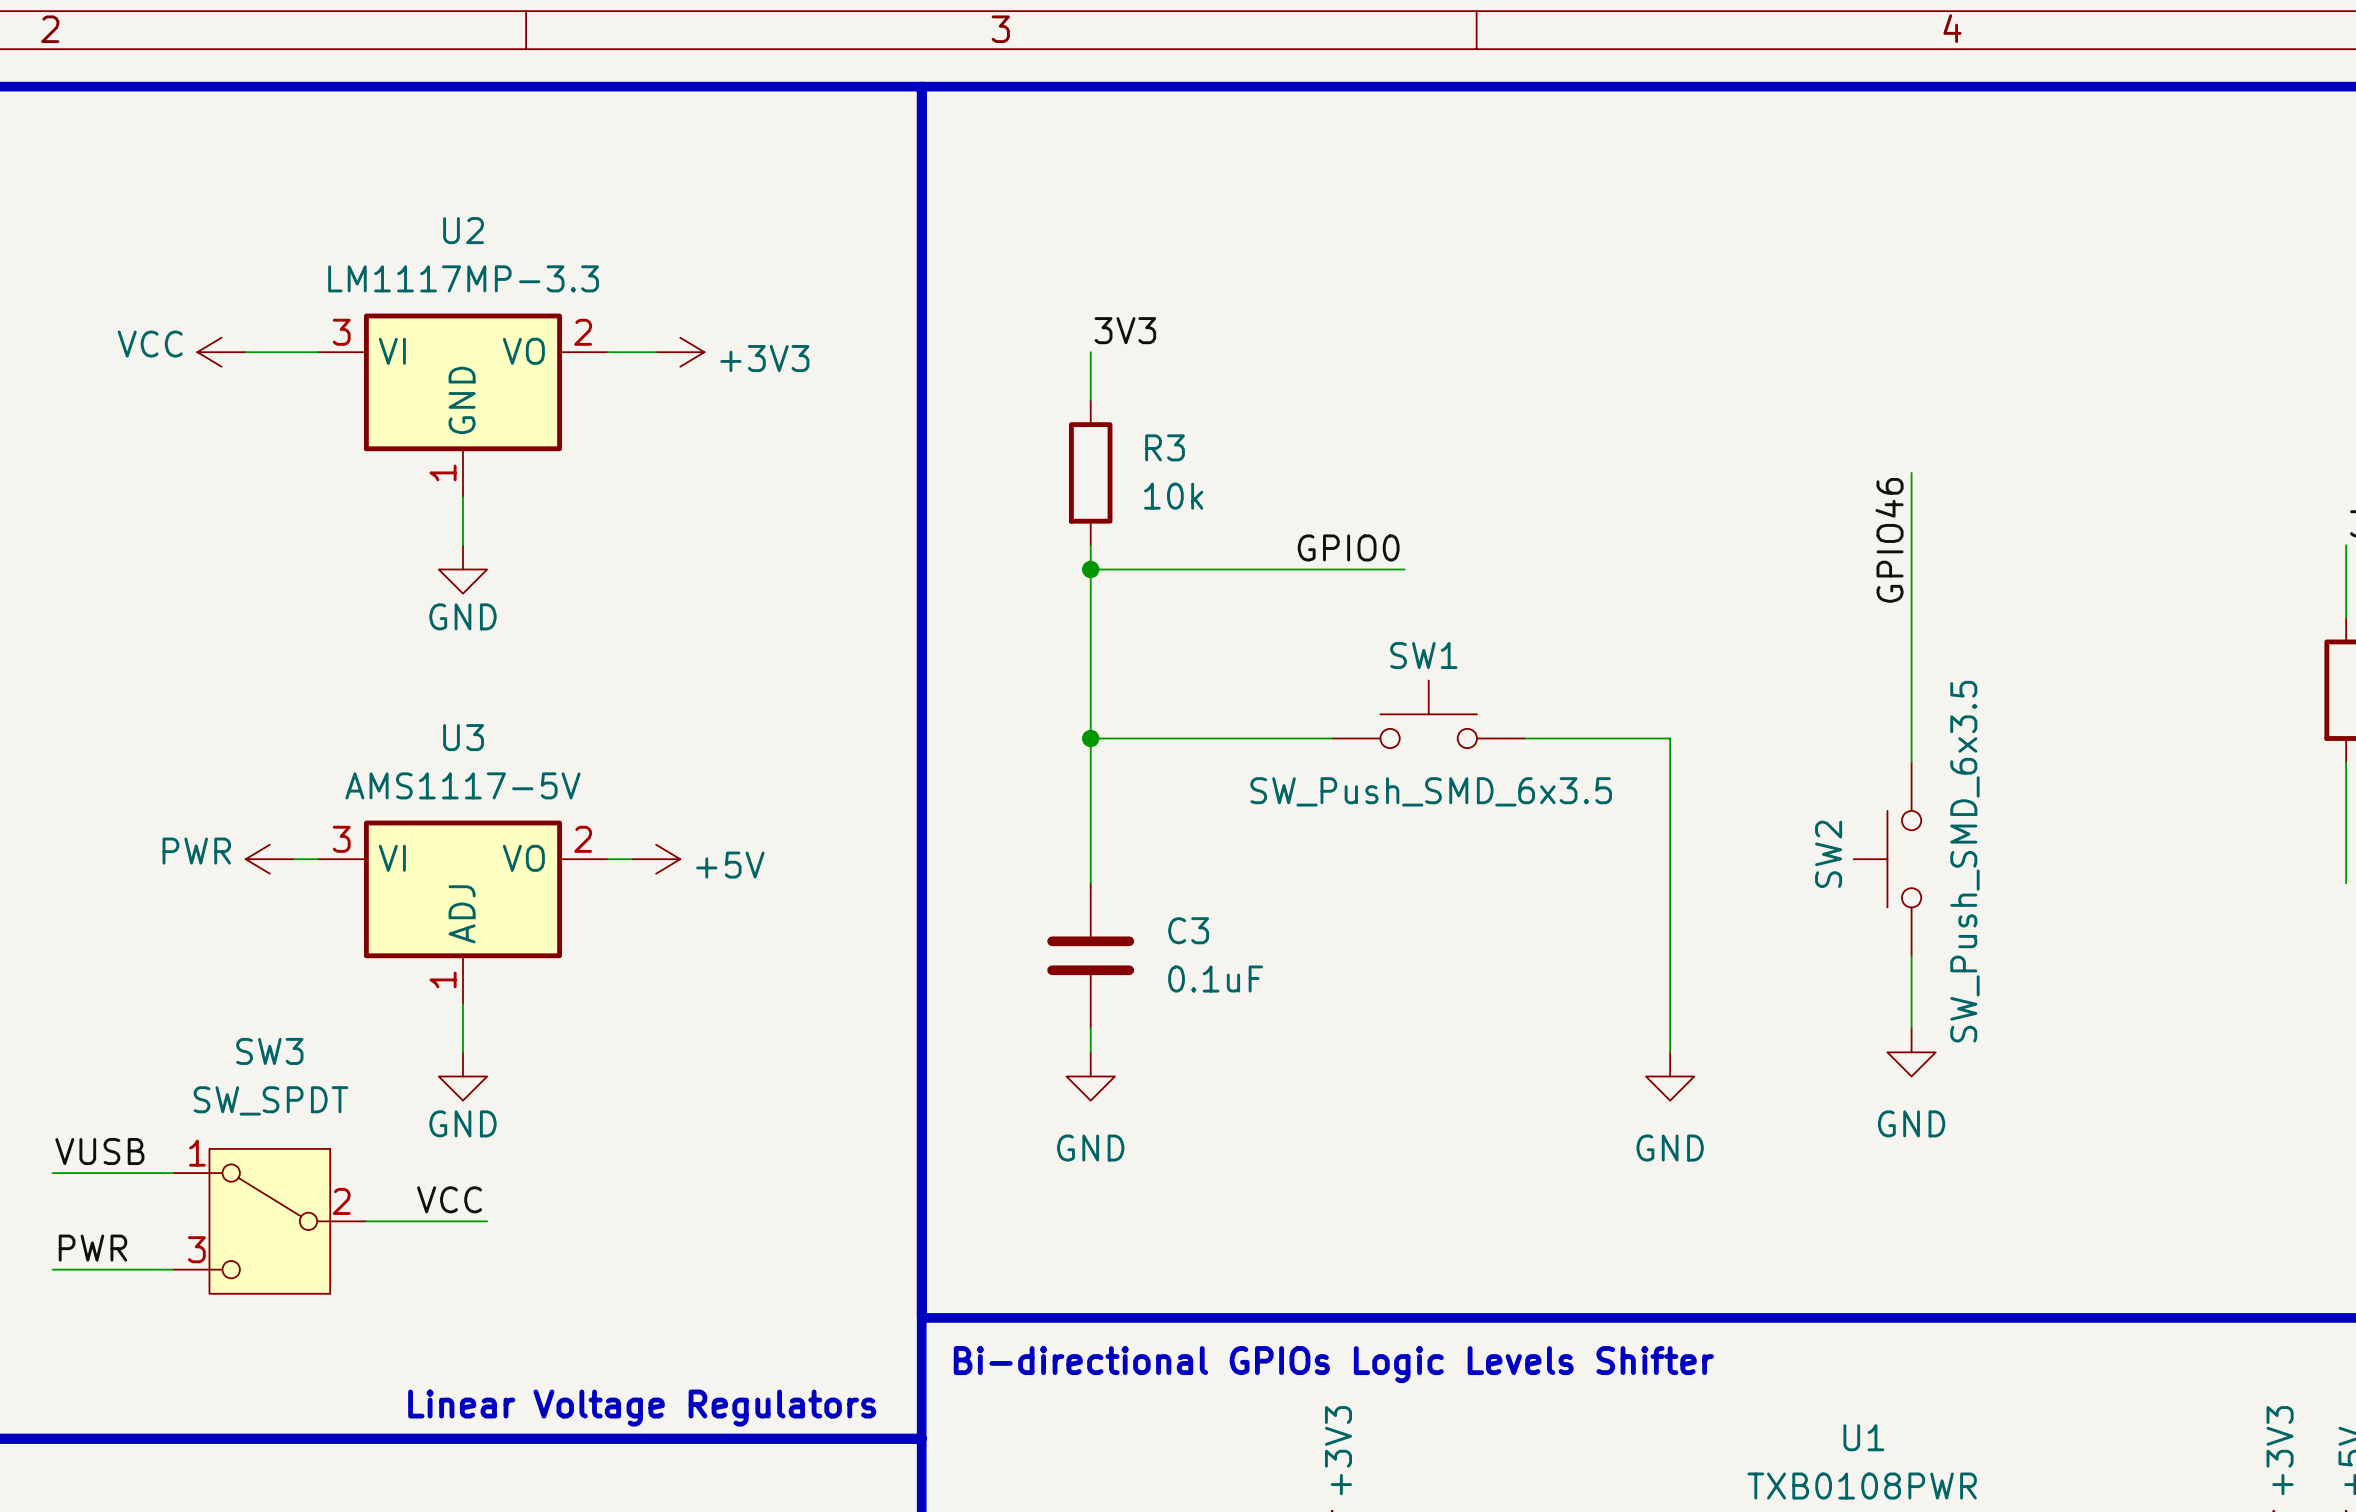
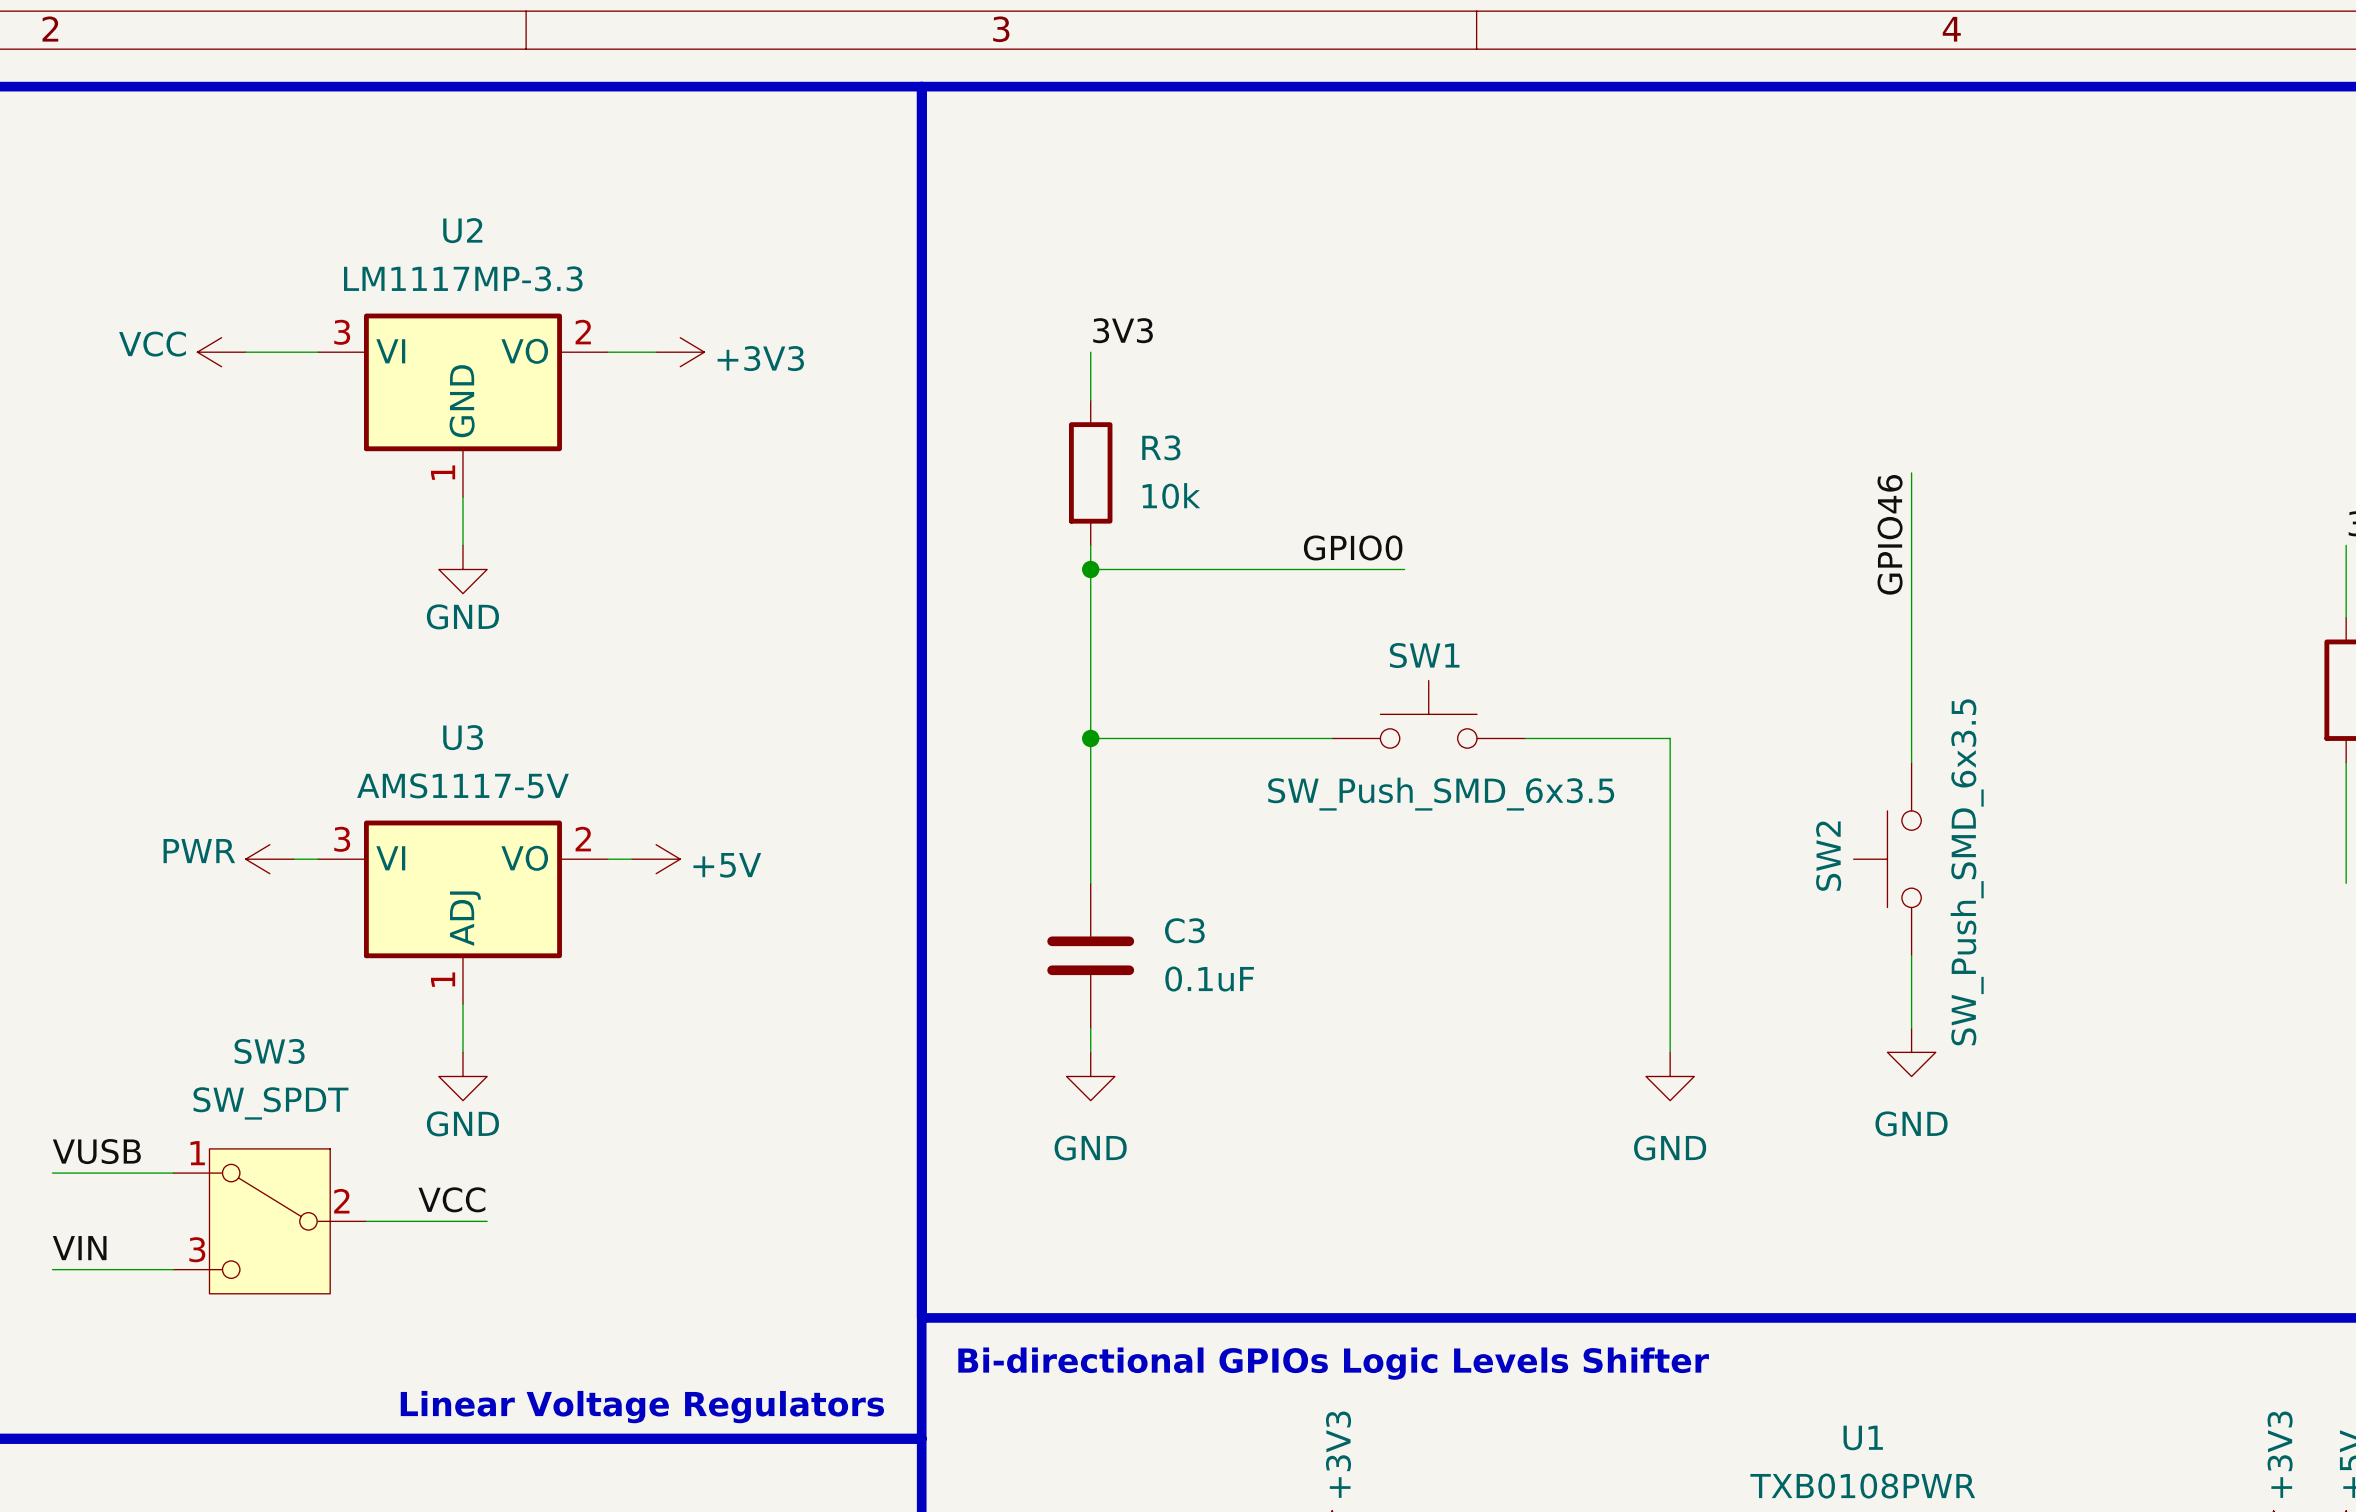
label: PWR (92, 1248) -> VIN (79, 1248)

